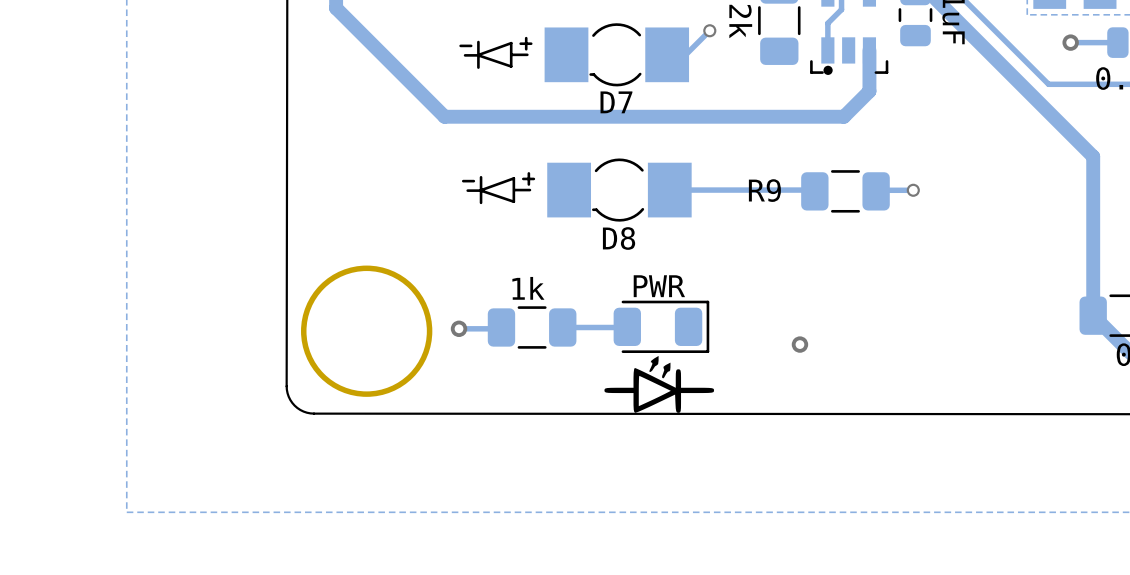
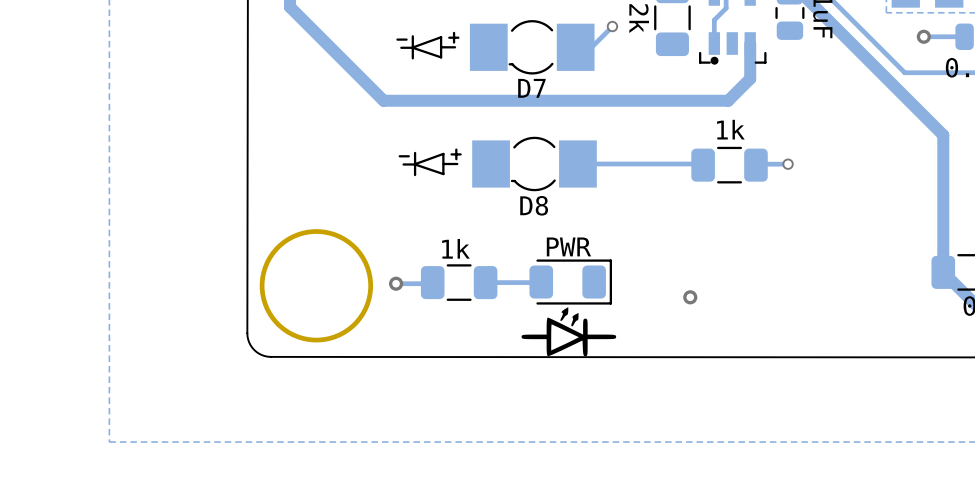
R9 value: none -> 1k (730, 129)
R9 name: R9 (764, 190) -> none

